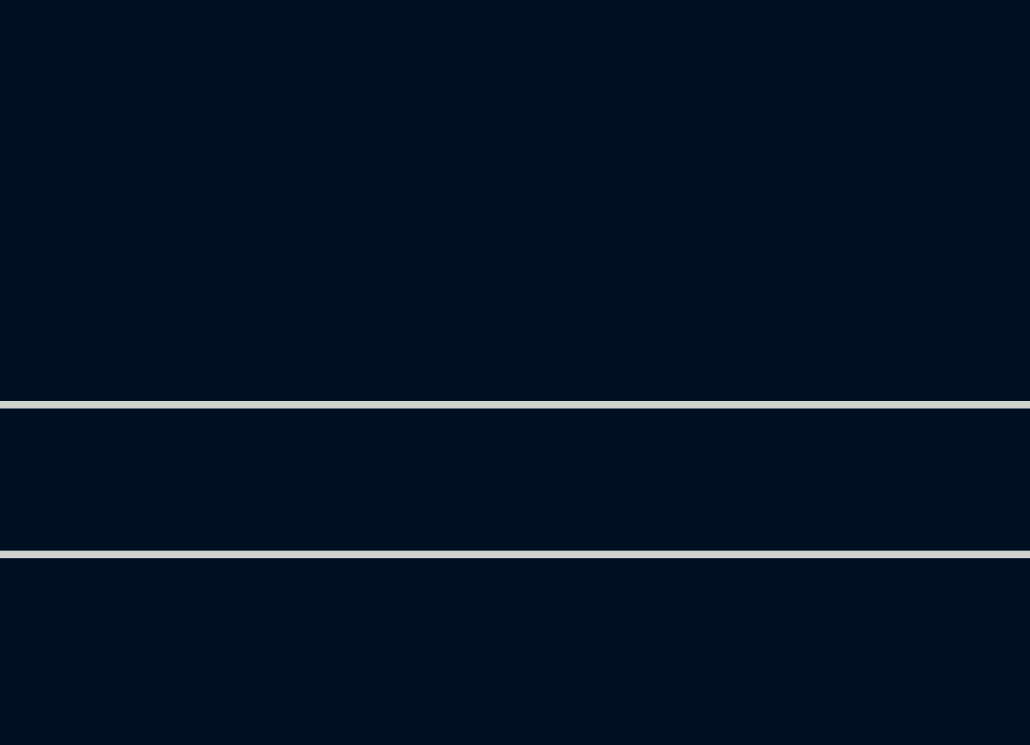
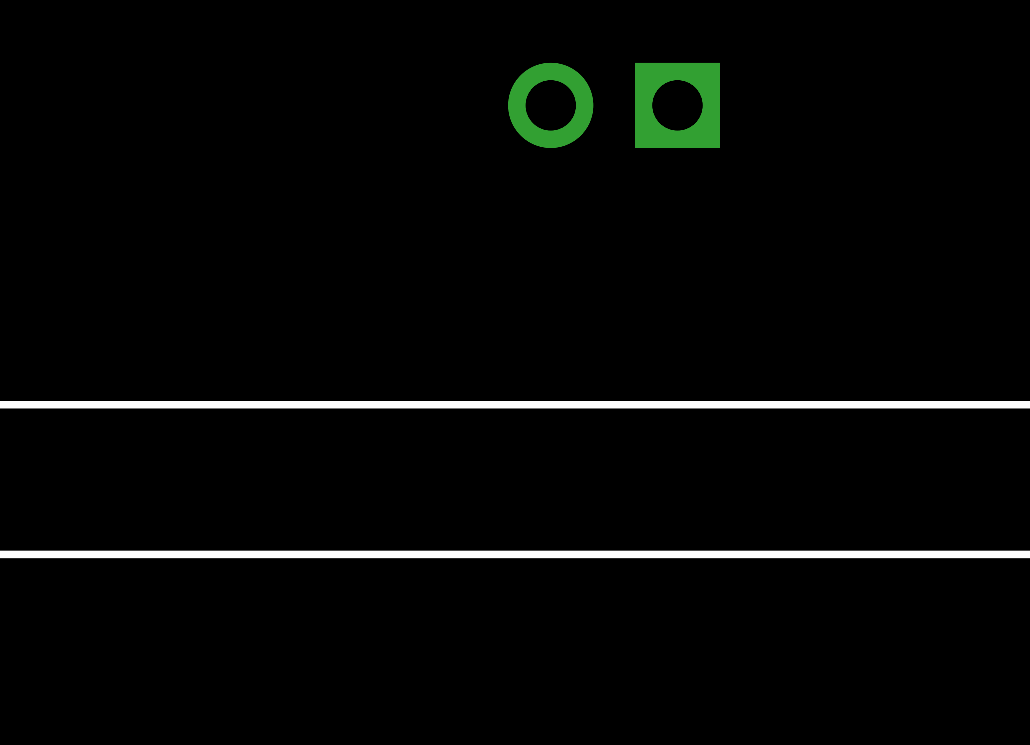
part: none -> (614, 105)

